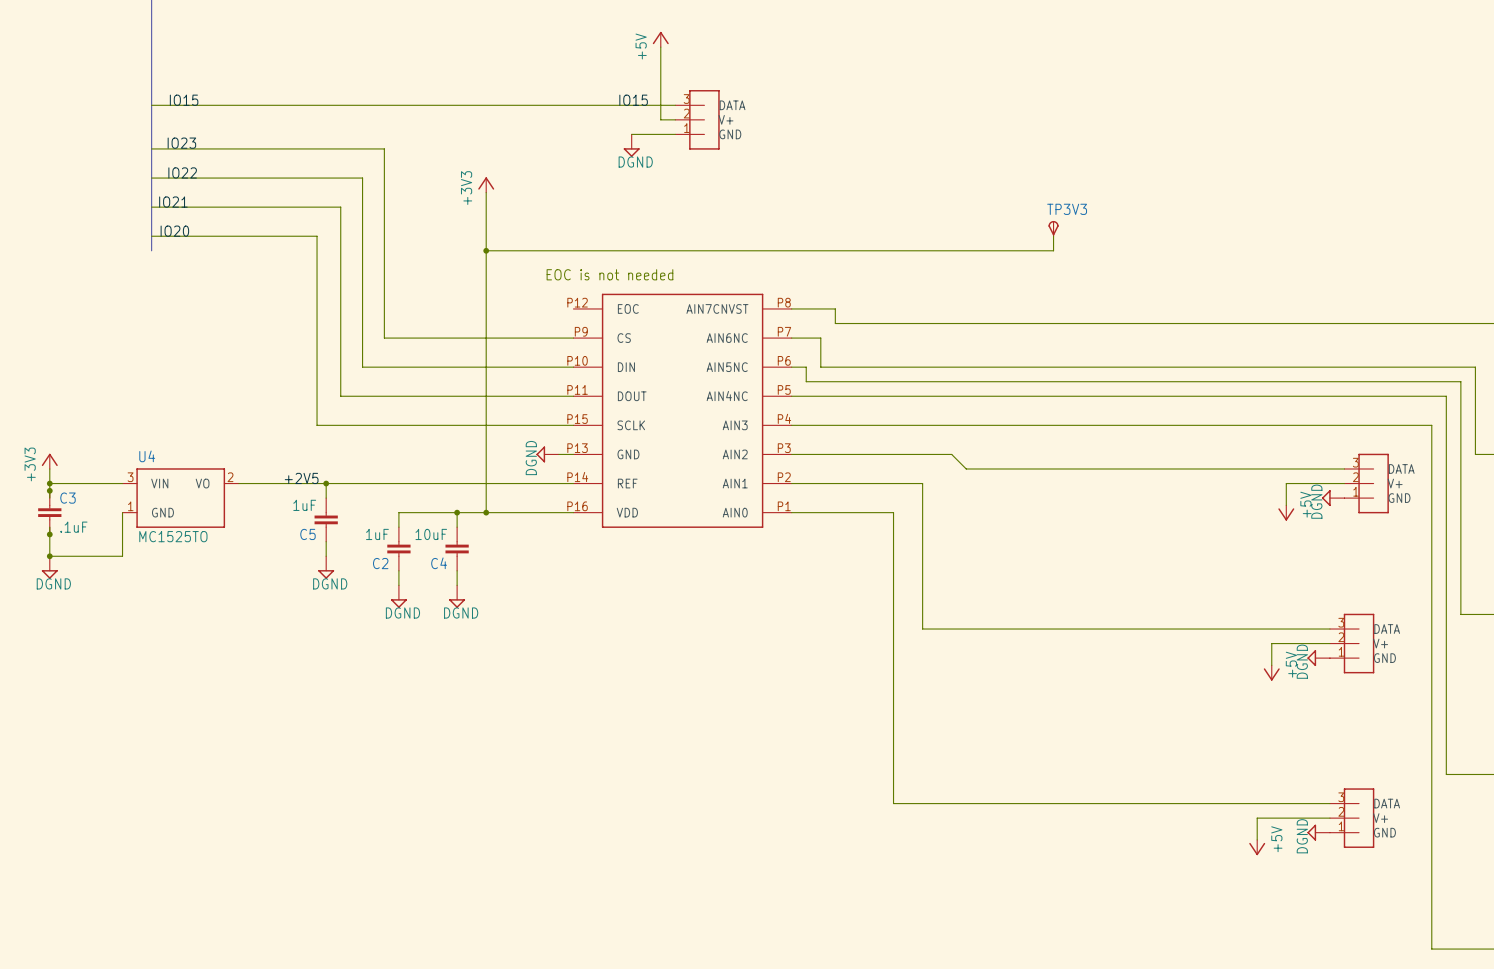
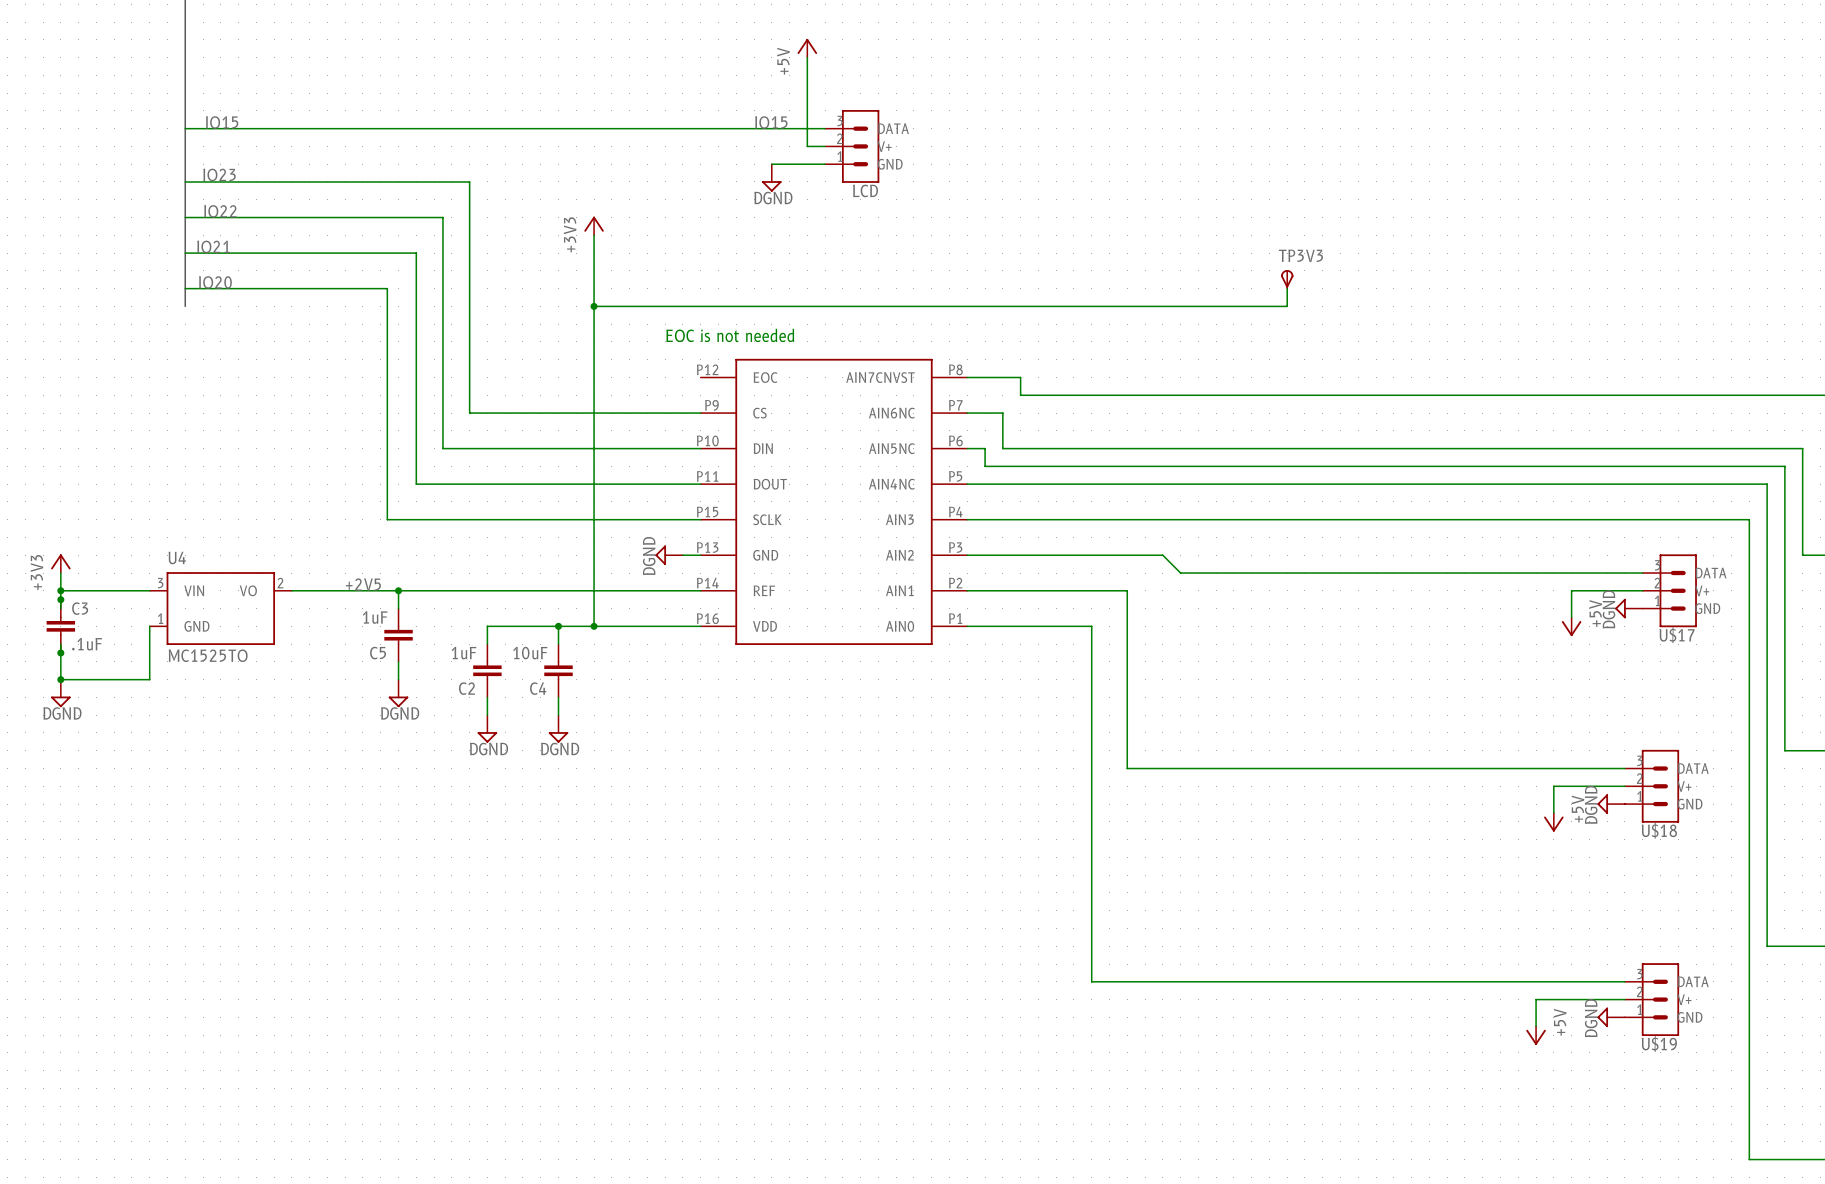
part: (697, 119) -> none
LCD: none -> (852, 146)
part: (1366, 483) -> none
U$17: none -> (1669, 590)
part: (1352, 643) -> none
U$18: none -> (1652, 786)
part: (1352, 818) -> none
U$19: none -> (1652, 999)

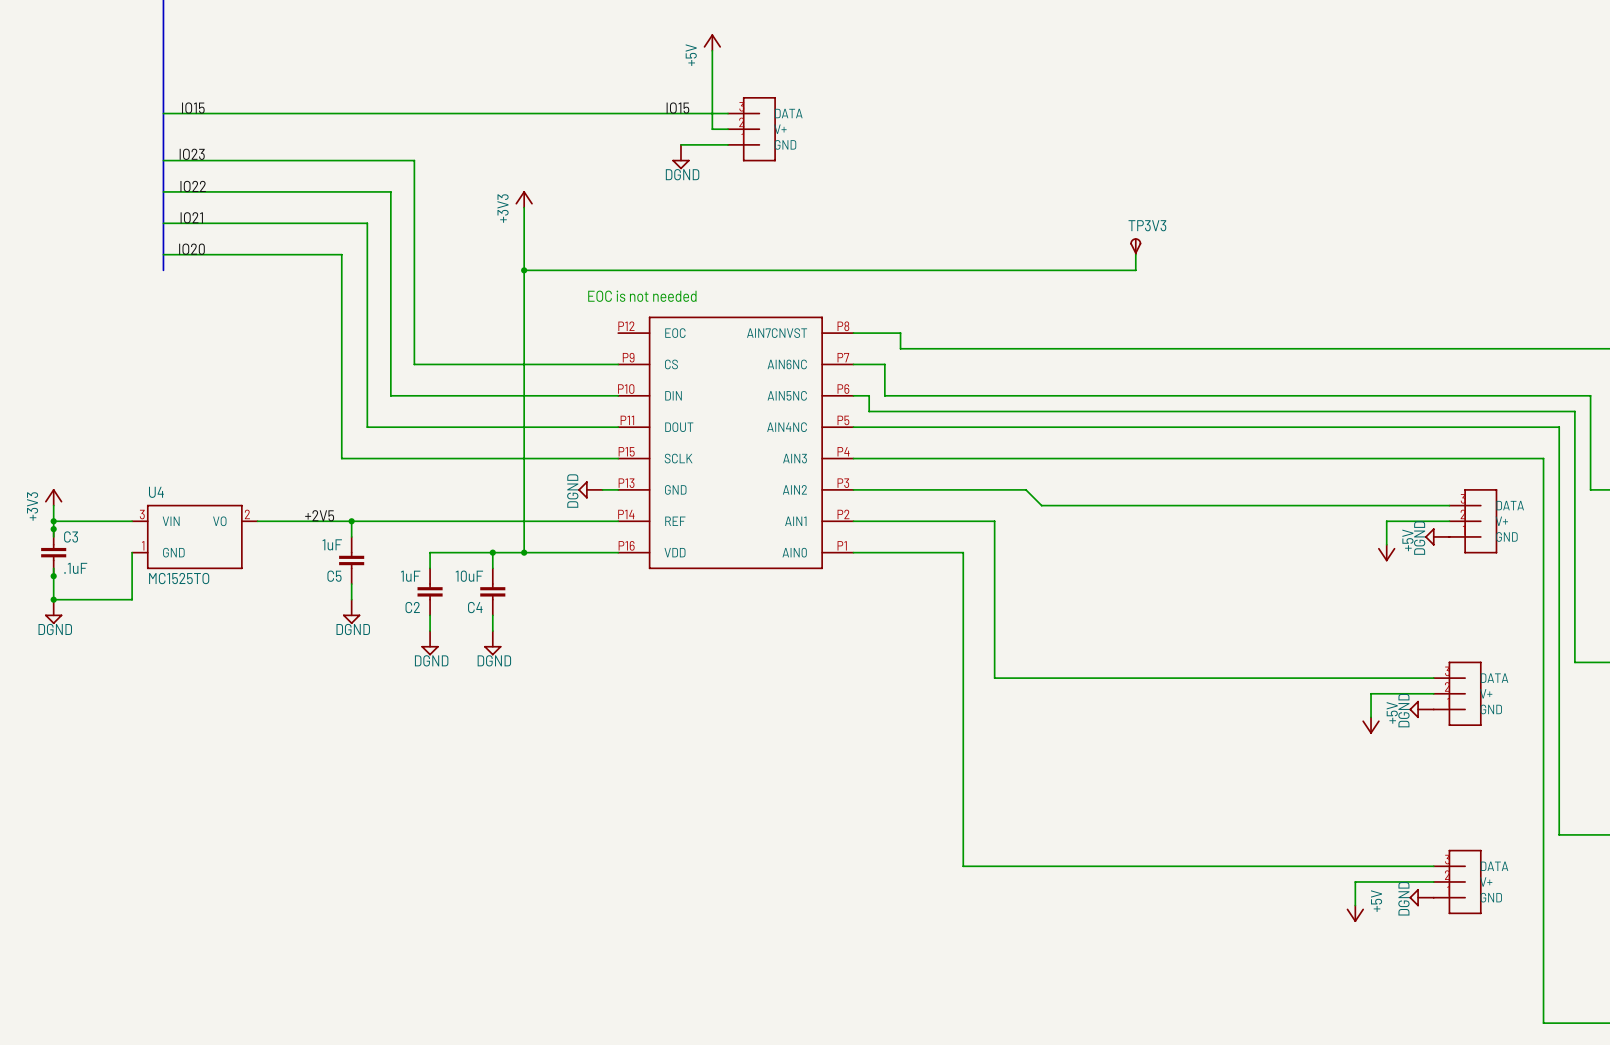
LCD: (852, 146) -> none
part: none -> (751, 129)
U$17: (1669, 590) -> none
part: none -> (1473, 521)
U$18: (1652, 786) -> none
part: none -> (1457, 693)
U$19: (1652, 999) -> none
part: none -> (1457, 881)

